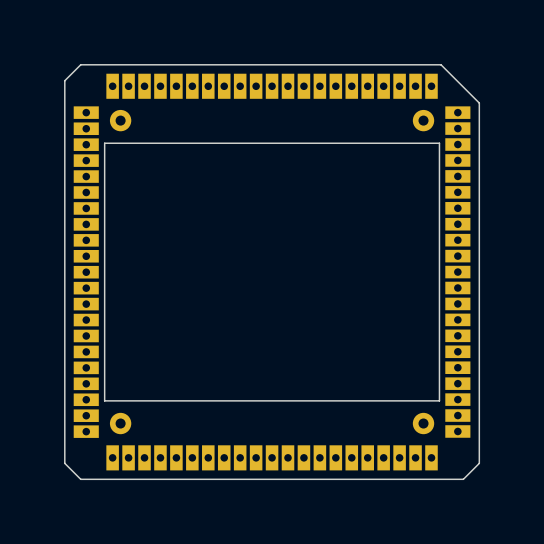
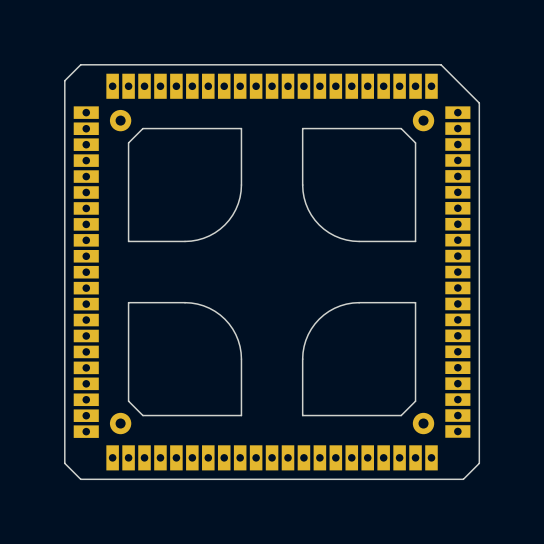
board edge: none -> (241, 128) (142, 128) (128, 142) (128, 241) (197, 240) (209, 235) (224, 224) (235, 209) (240, 197) (241, 128)
board edge: none -> (401, 128) (302, 128) (304, 197) (311, 215) (323, 229) (334, 235) (352, 241) (415, 241) (415, 142) (401, 128)
board edge: (439, 143) (439, 400) (104, 400) (104, 143) (439, 143) -> none
board edge: none -> (185, 302) (128, 302) (128, 401) (142, 415) (241, 415) (241, 352) (235, 334) (224, 319) (215, 311) (203, 305) (185, 302)
board edge: none -> (415, 302) (346, 304) (334, 308) (319, 319) (308, 334) (304, 346) (302, 415) (401, 415) (415, 401) (415, 302)

